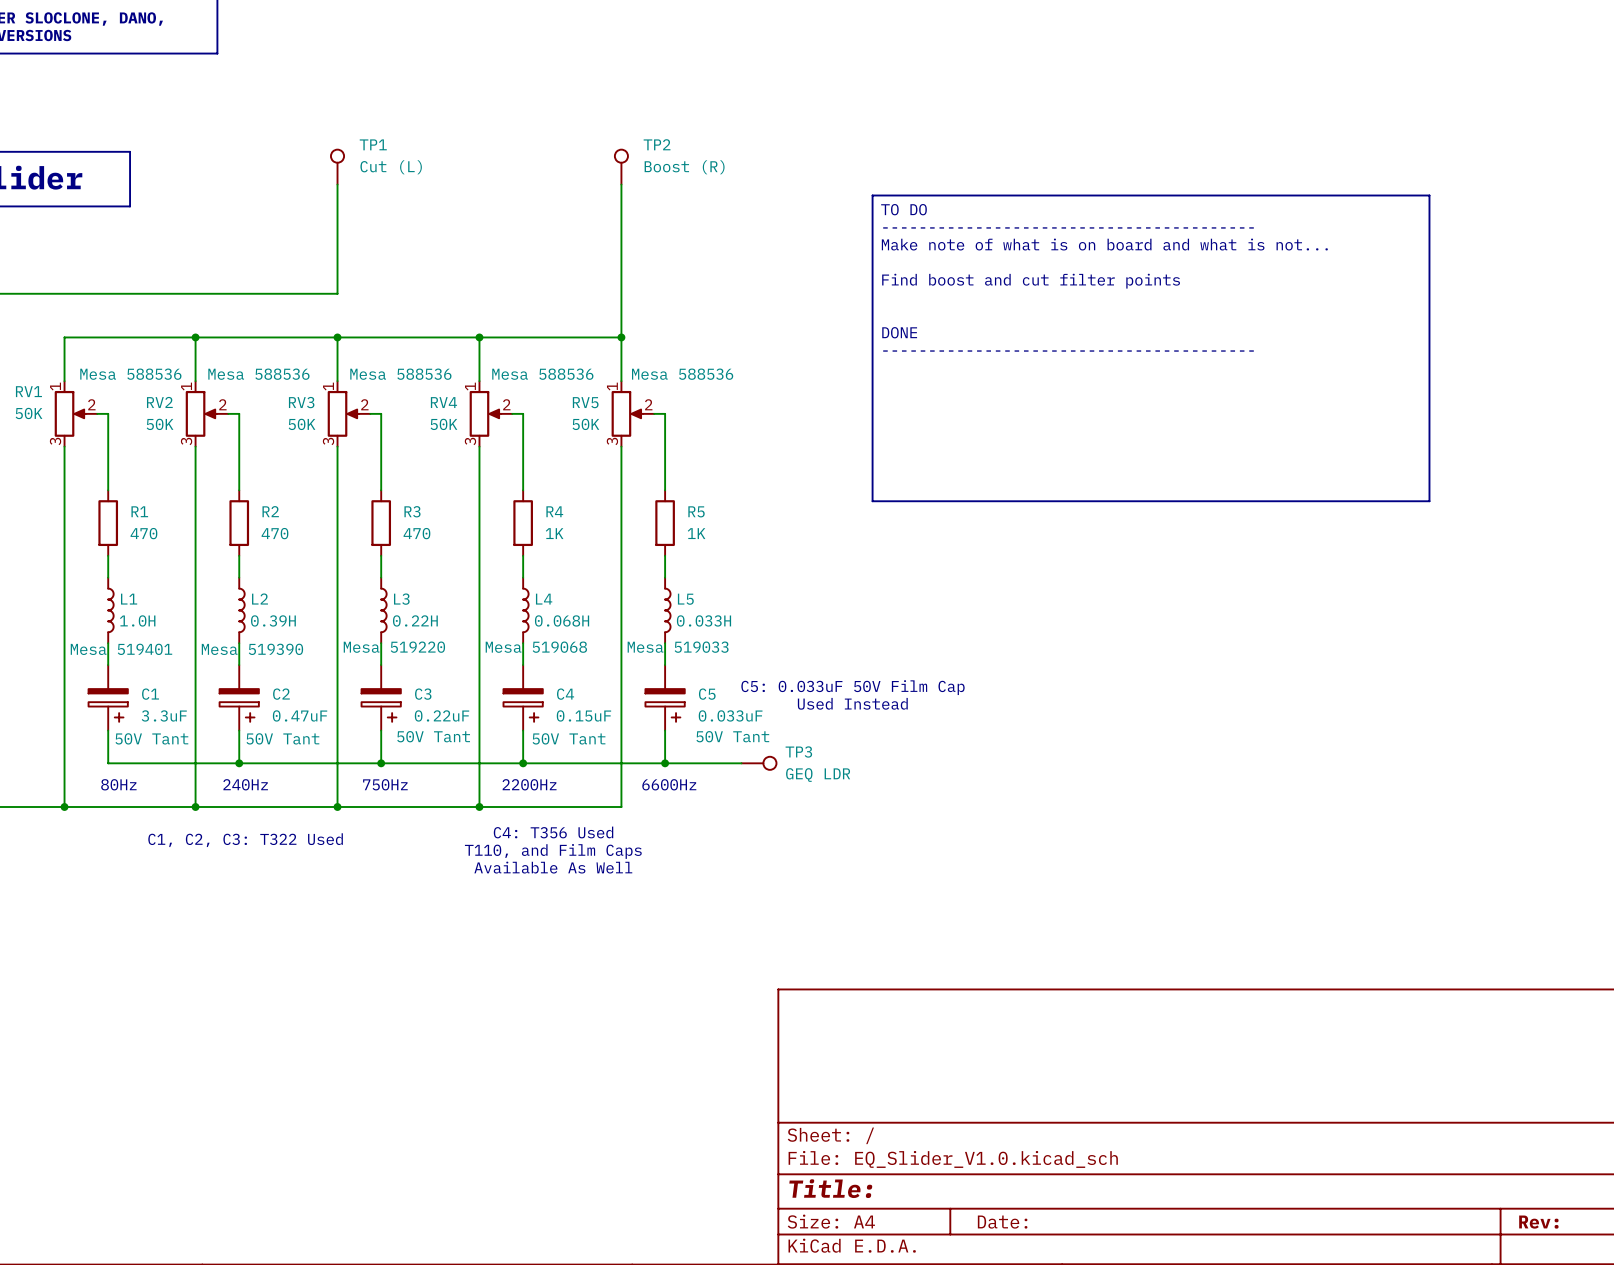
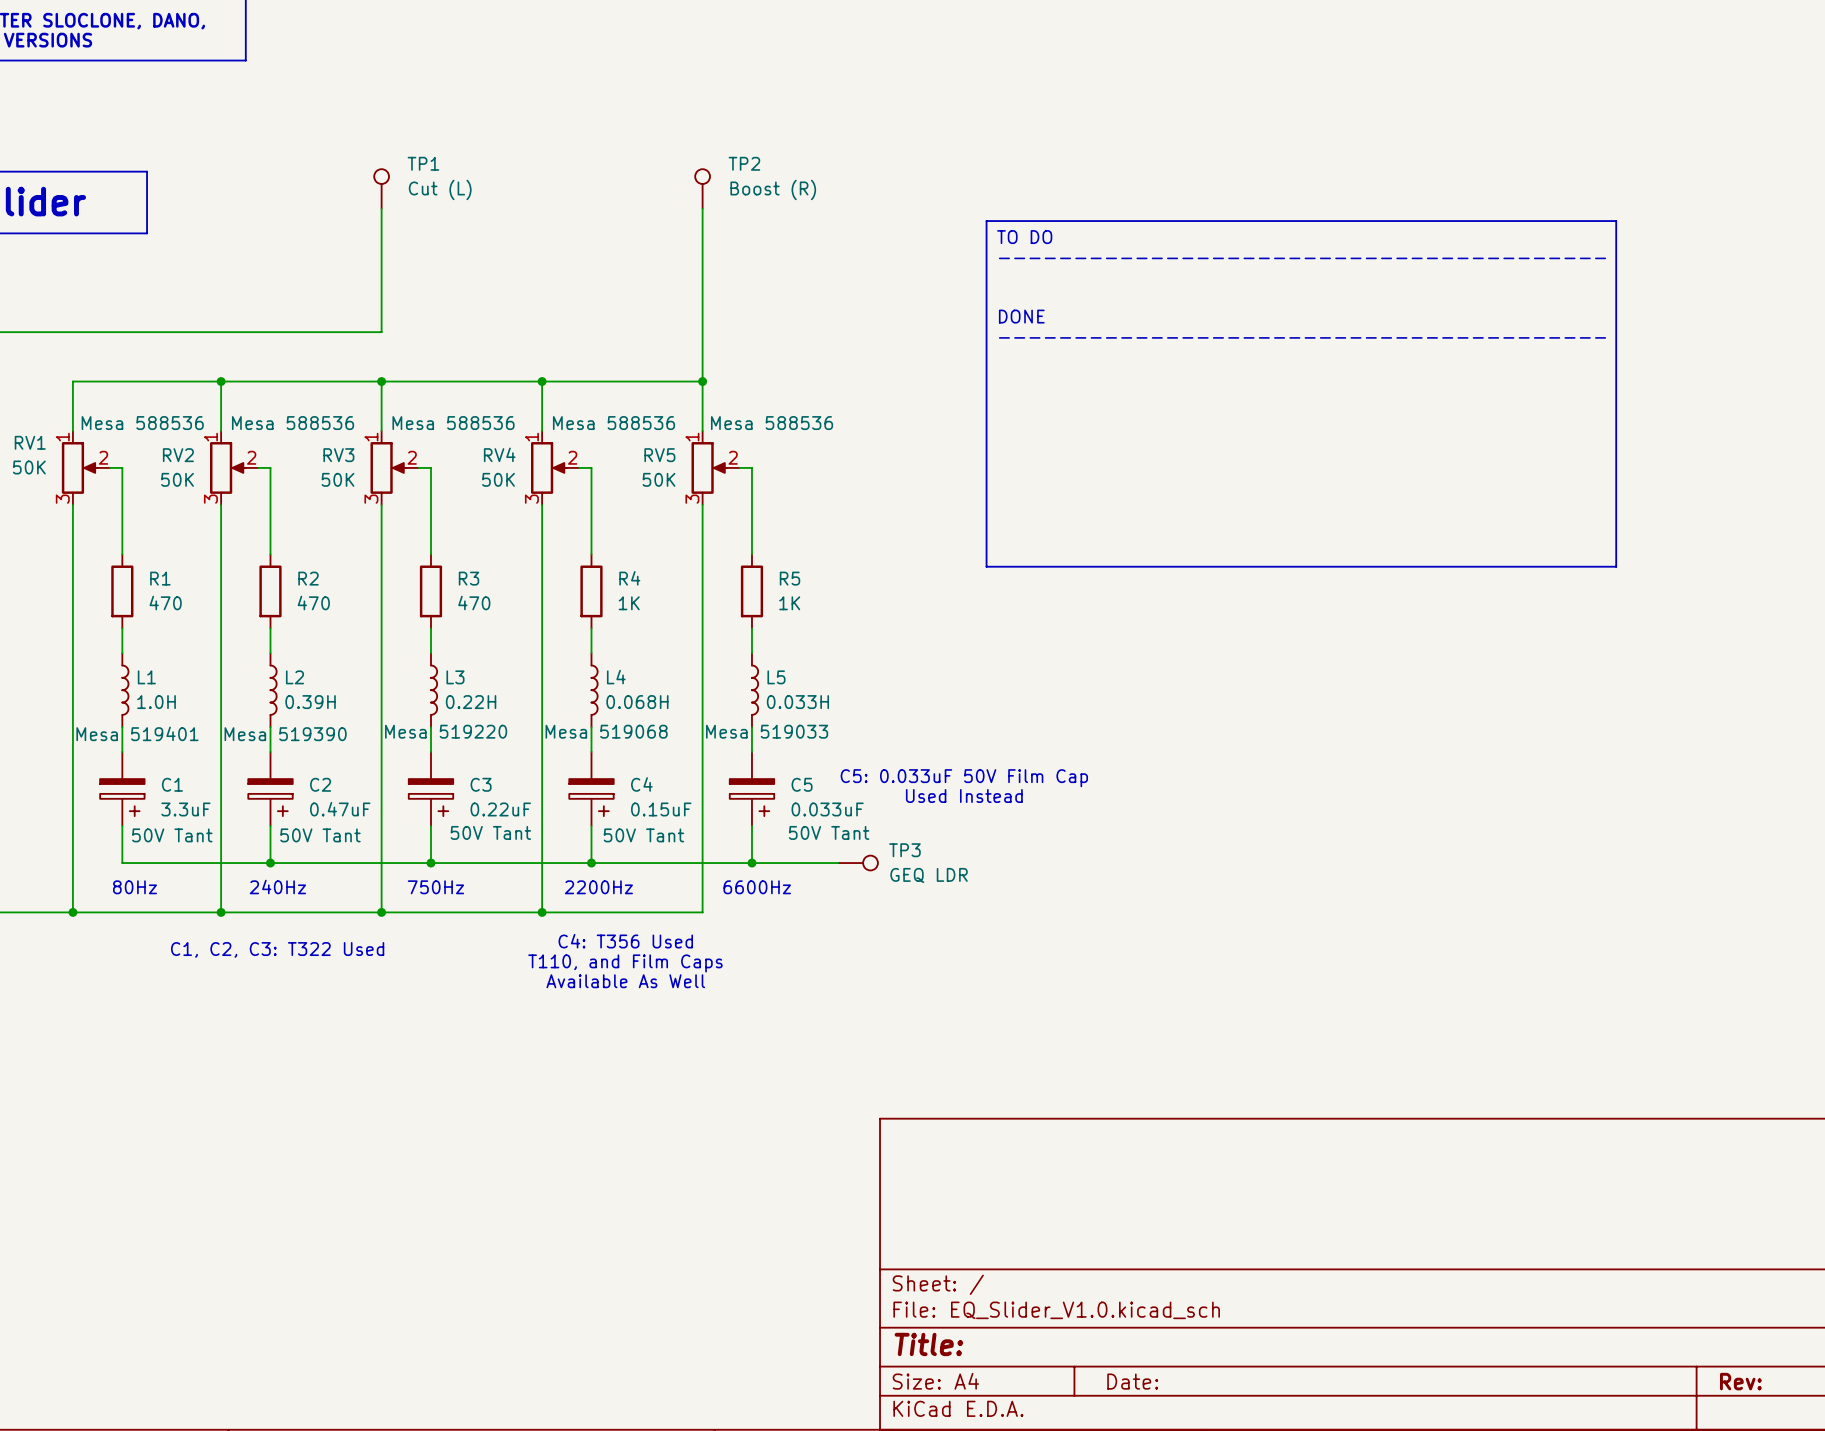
text: Make note of what is on board and what is not... (1104, 244) -> none
text: Find boost and cut filter points (1031, 281) -> DONE (1021, 316)
text: DONE (899, 332) -> none
text position: ---------------------------------------- (1068, 351) -> ---------------------------------------- (1302, 337)

